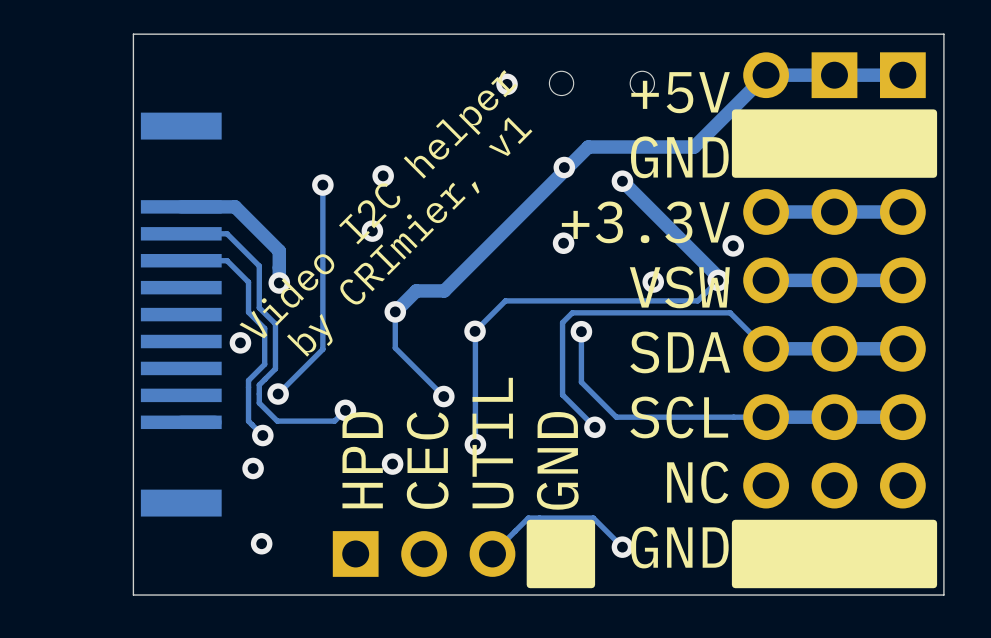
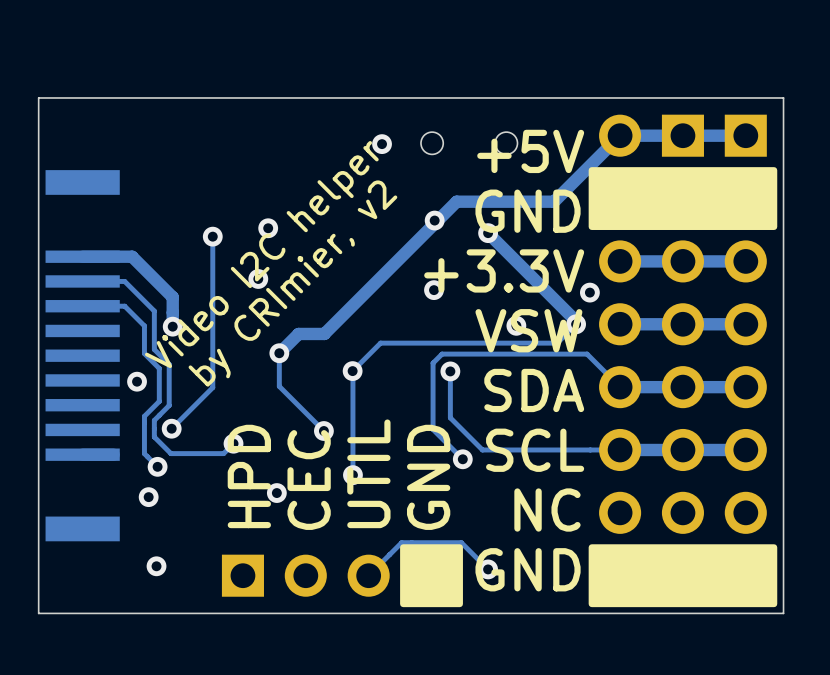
text: by CRImier, v1 (409, 237) -> by CRImier, v2 (292, 283)

